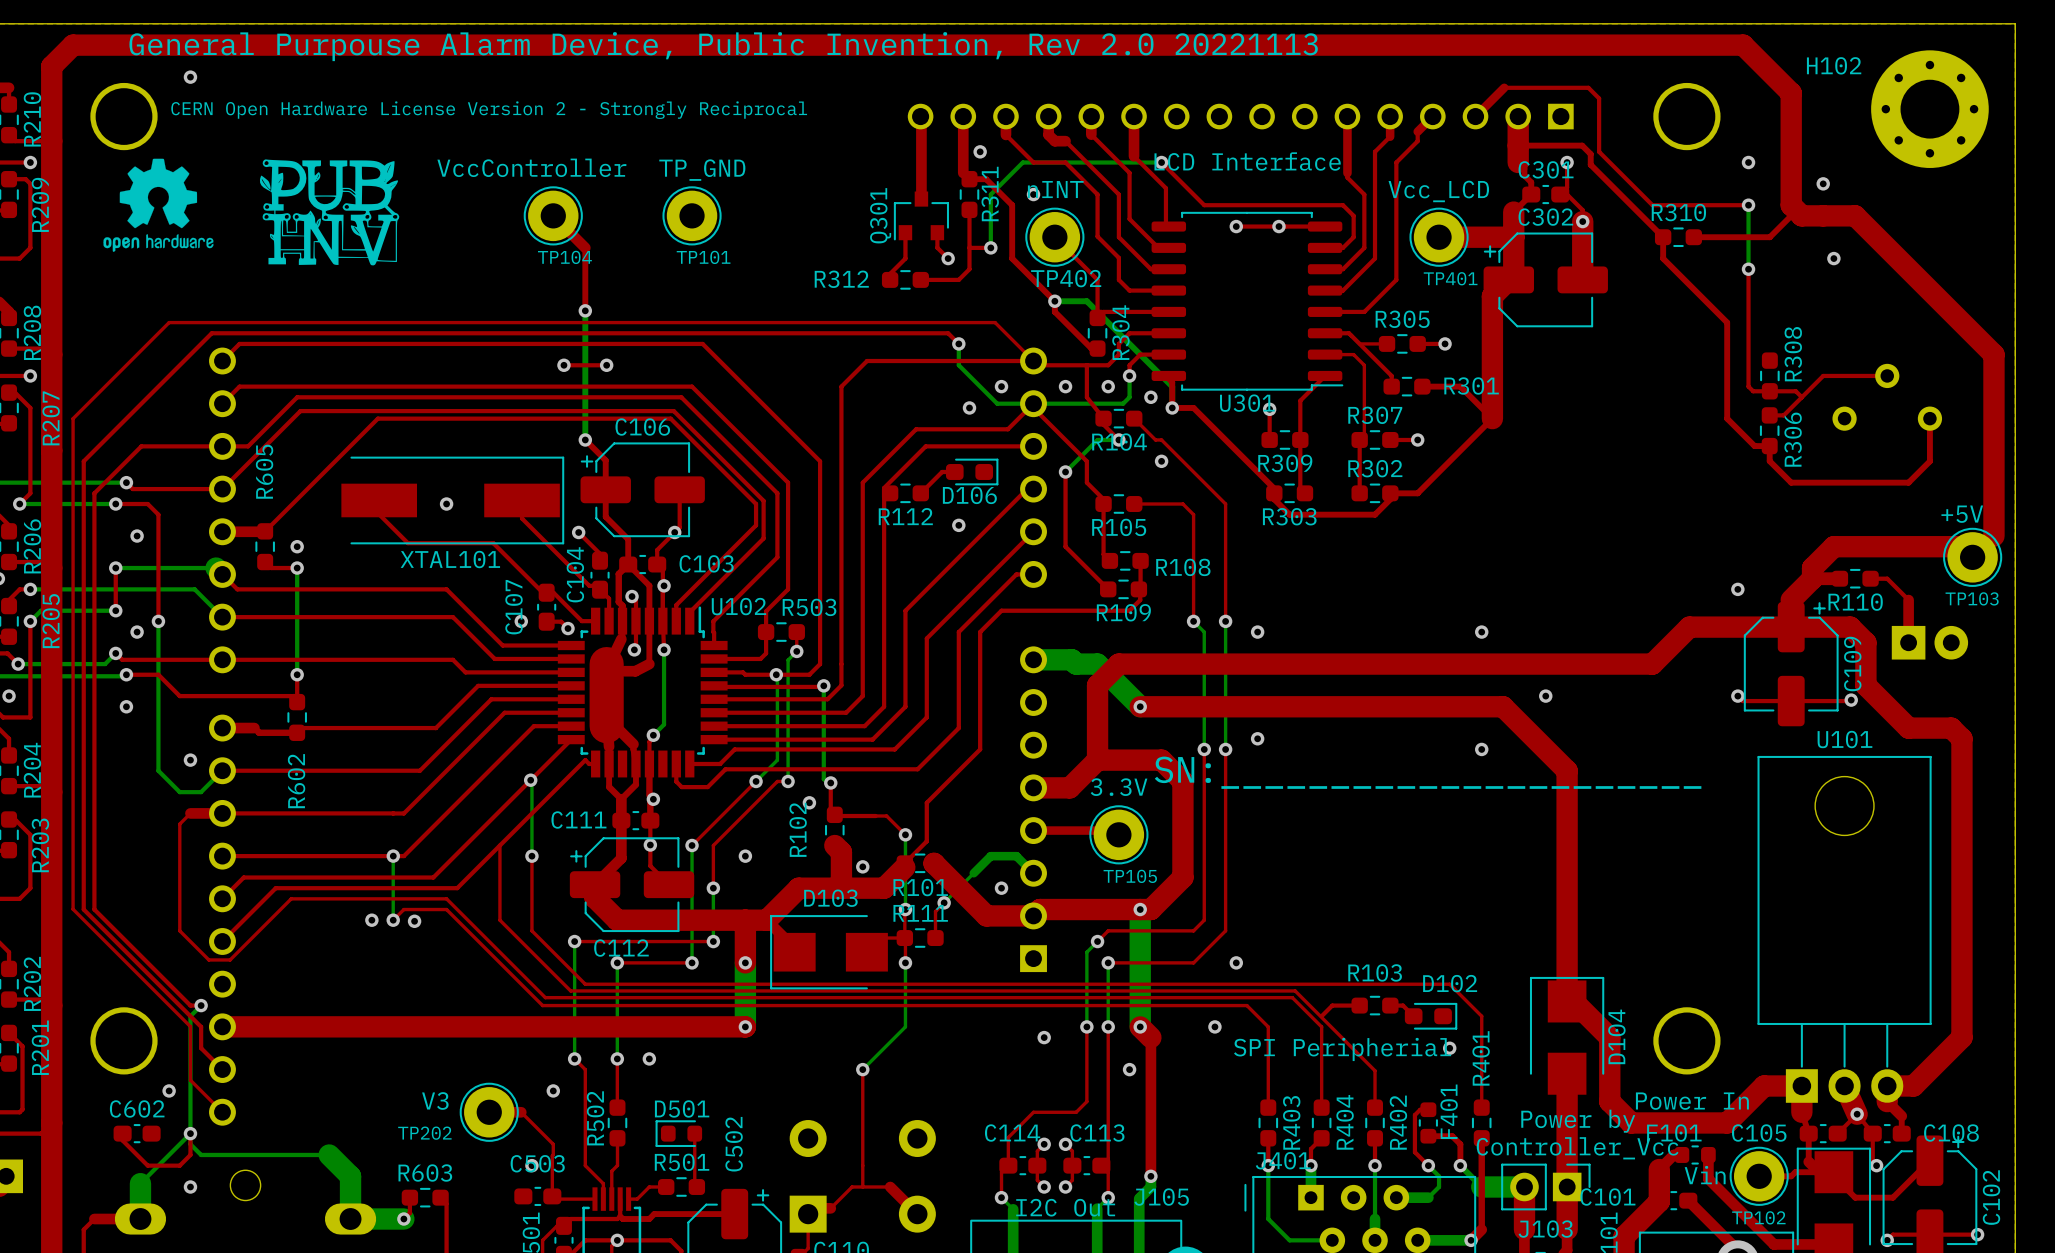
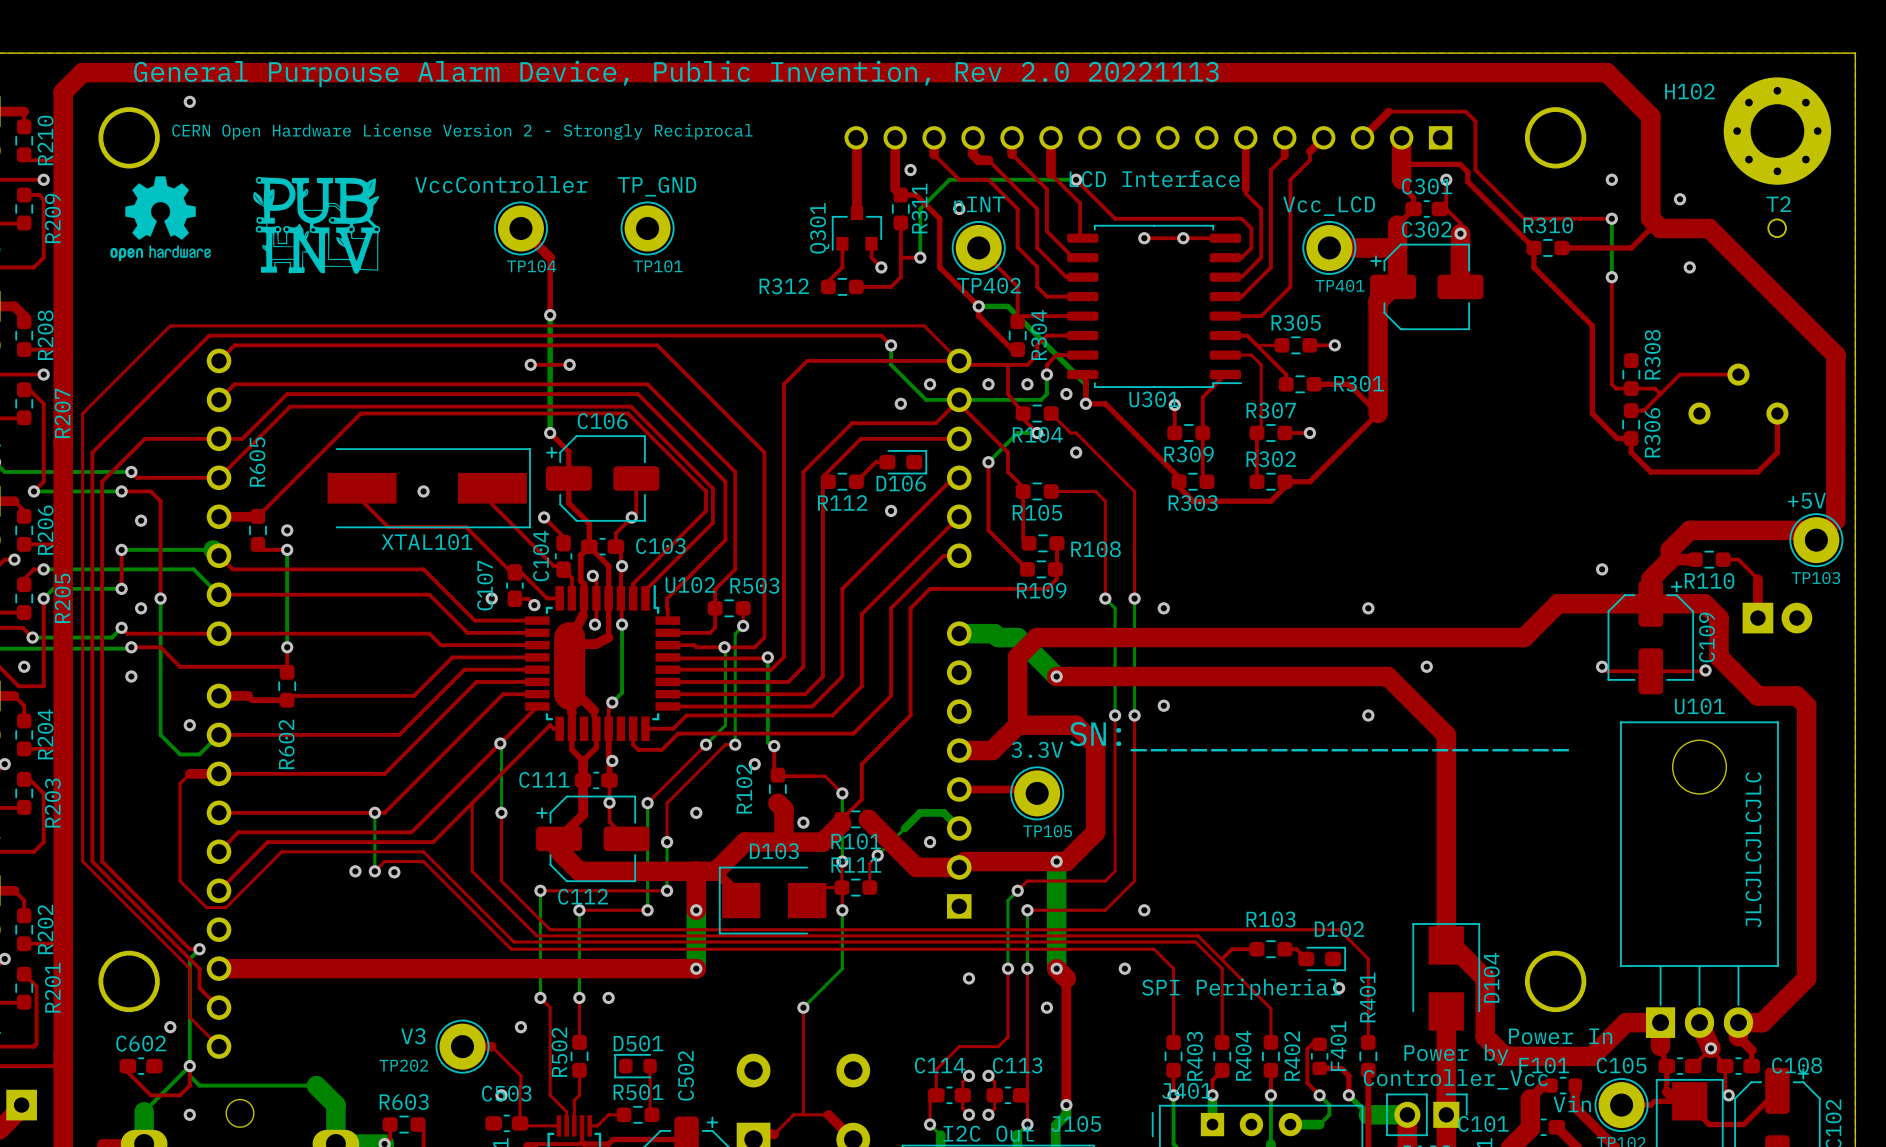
T2: none -> (1777, 228)
text: none -> JLCJLCJLCJLC (1753, 849)

